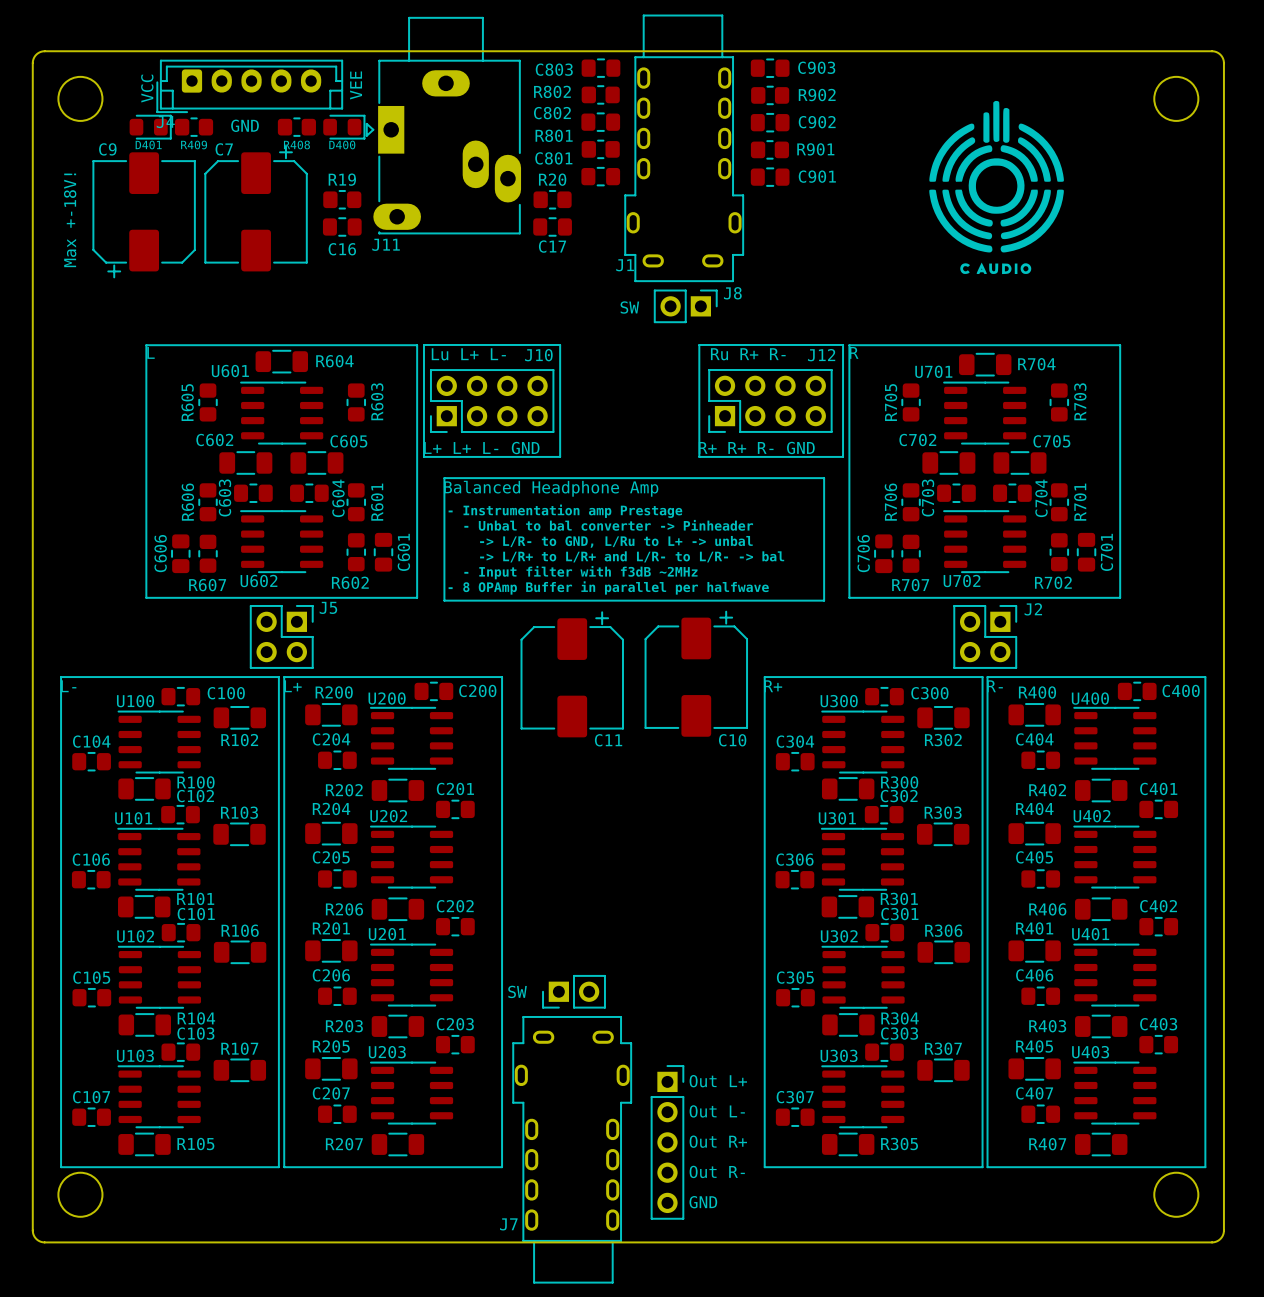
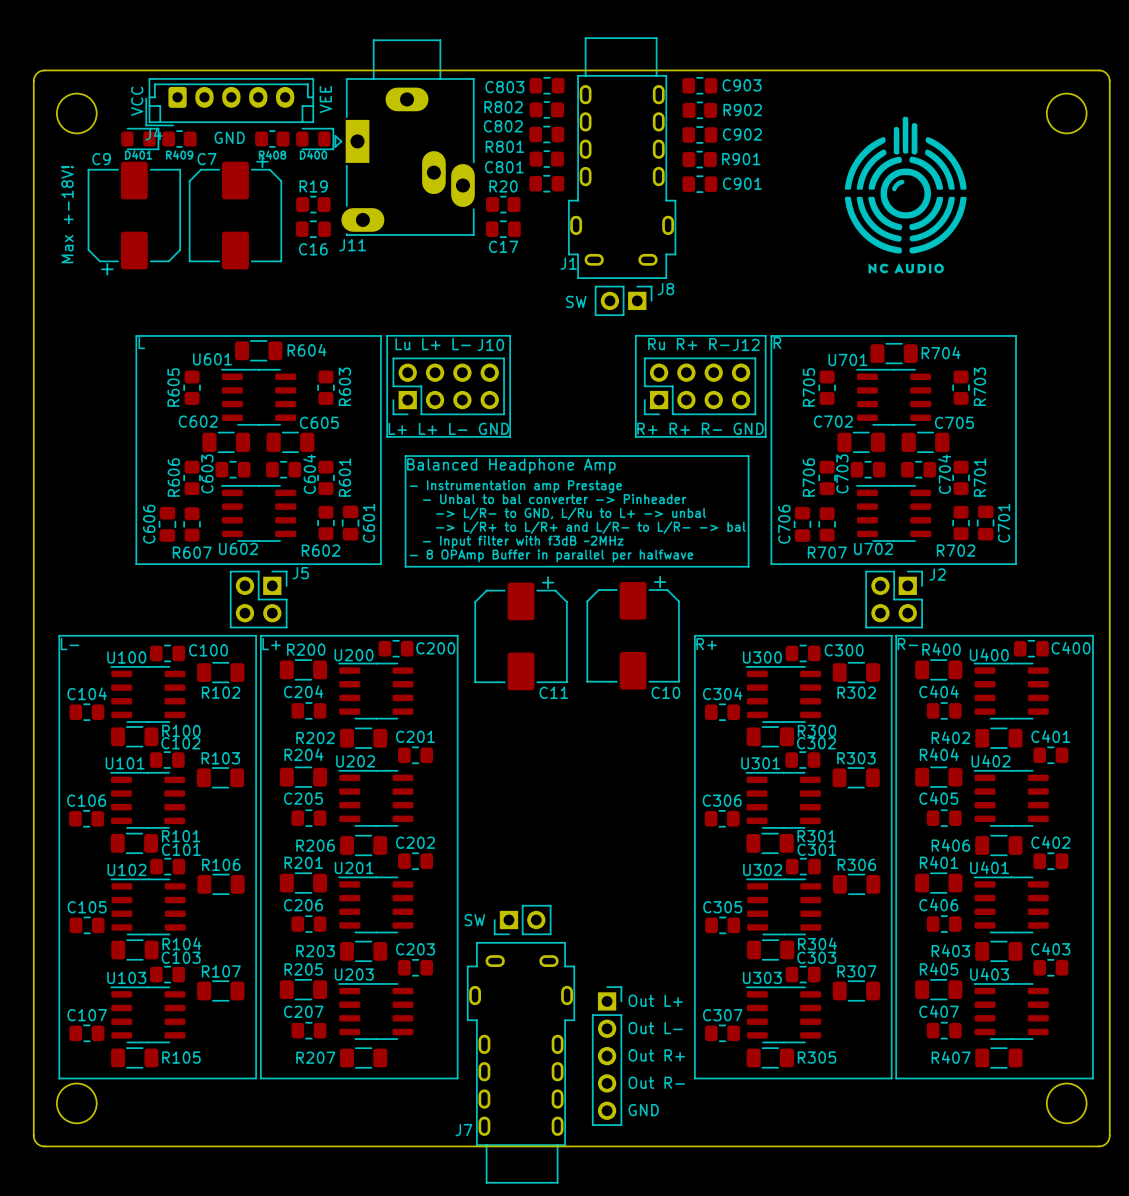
drawing shape: [929, 100, 1064, 275] -> [844, 116, 967, 274]

